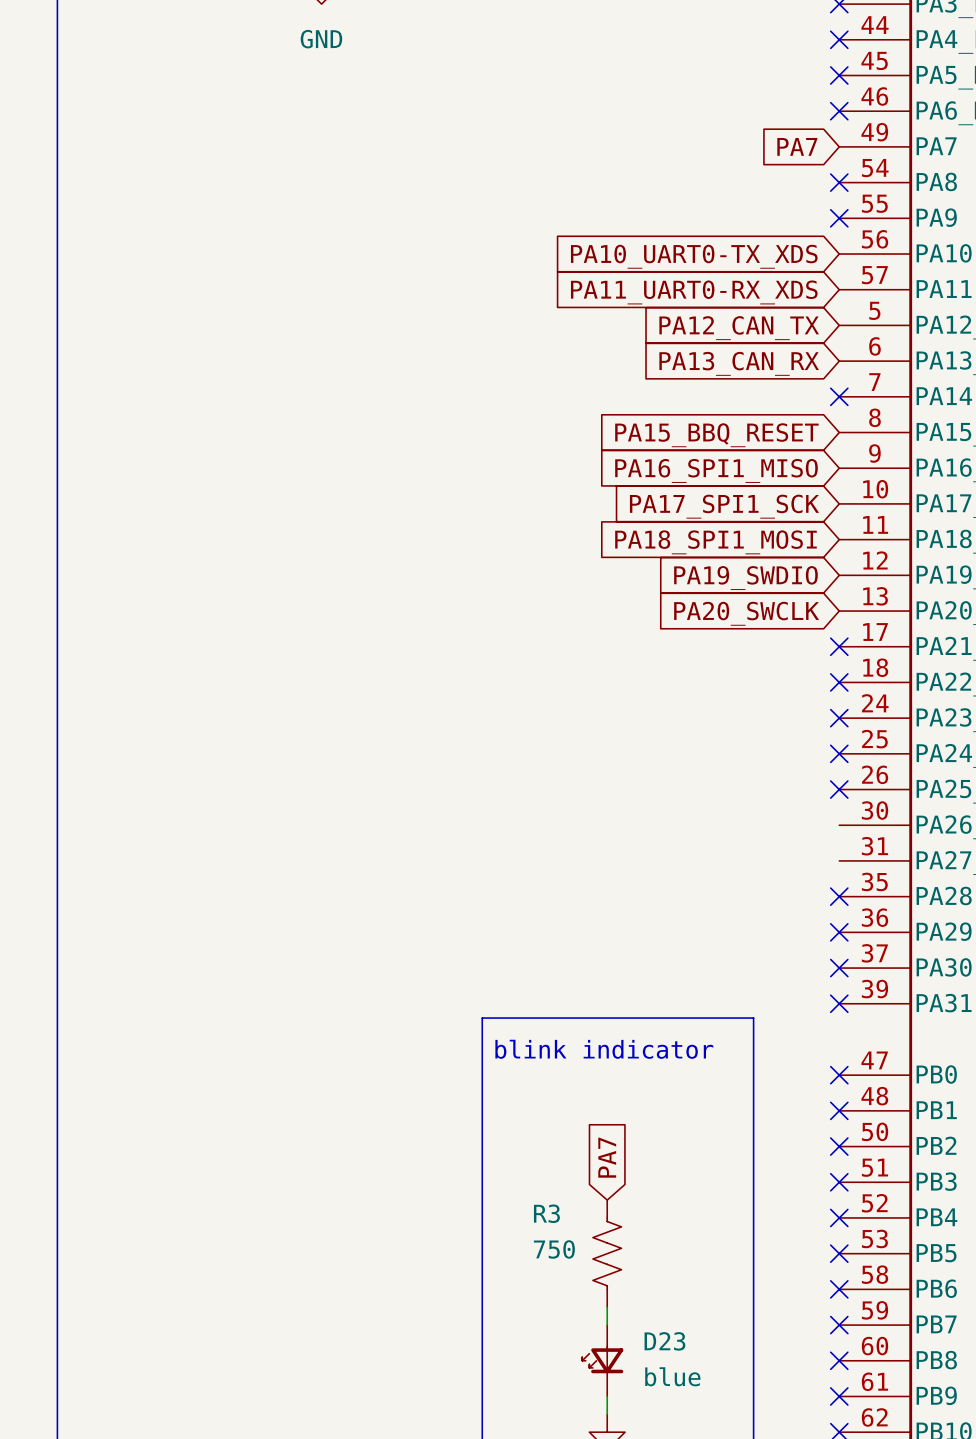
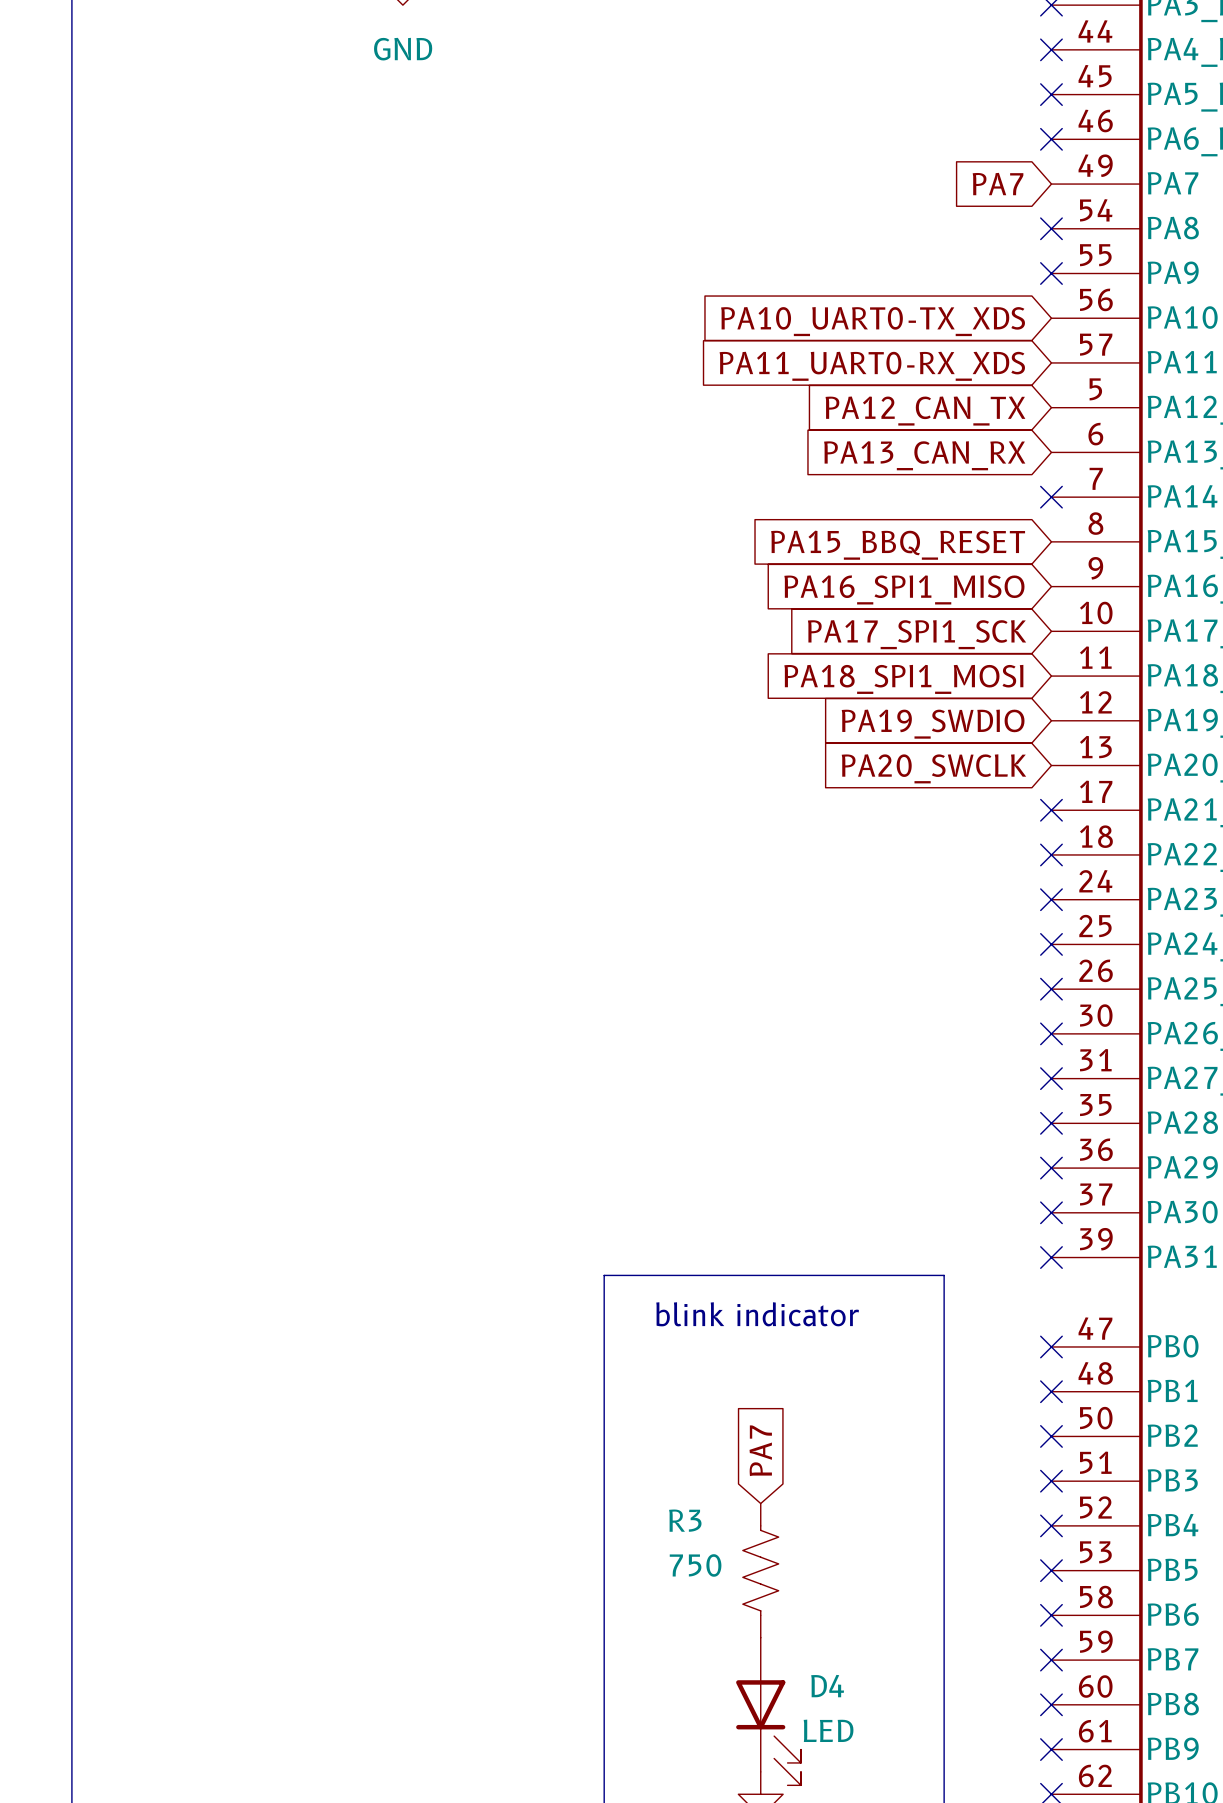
no-connect mark: none -> (1051, 1033)
no-connect mark: none -> (1051, 1078)
D23: blue (602, 1360) -> none
D4: none -> LED (768, 1711)

